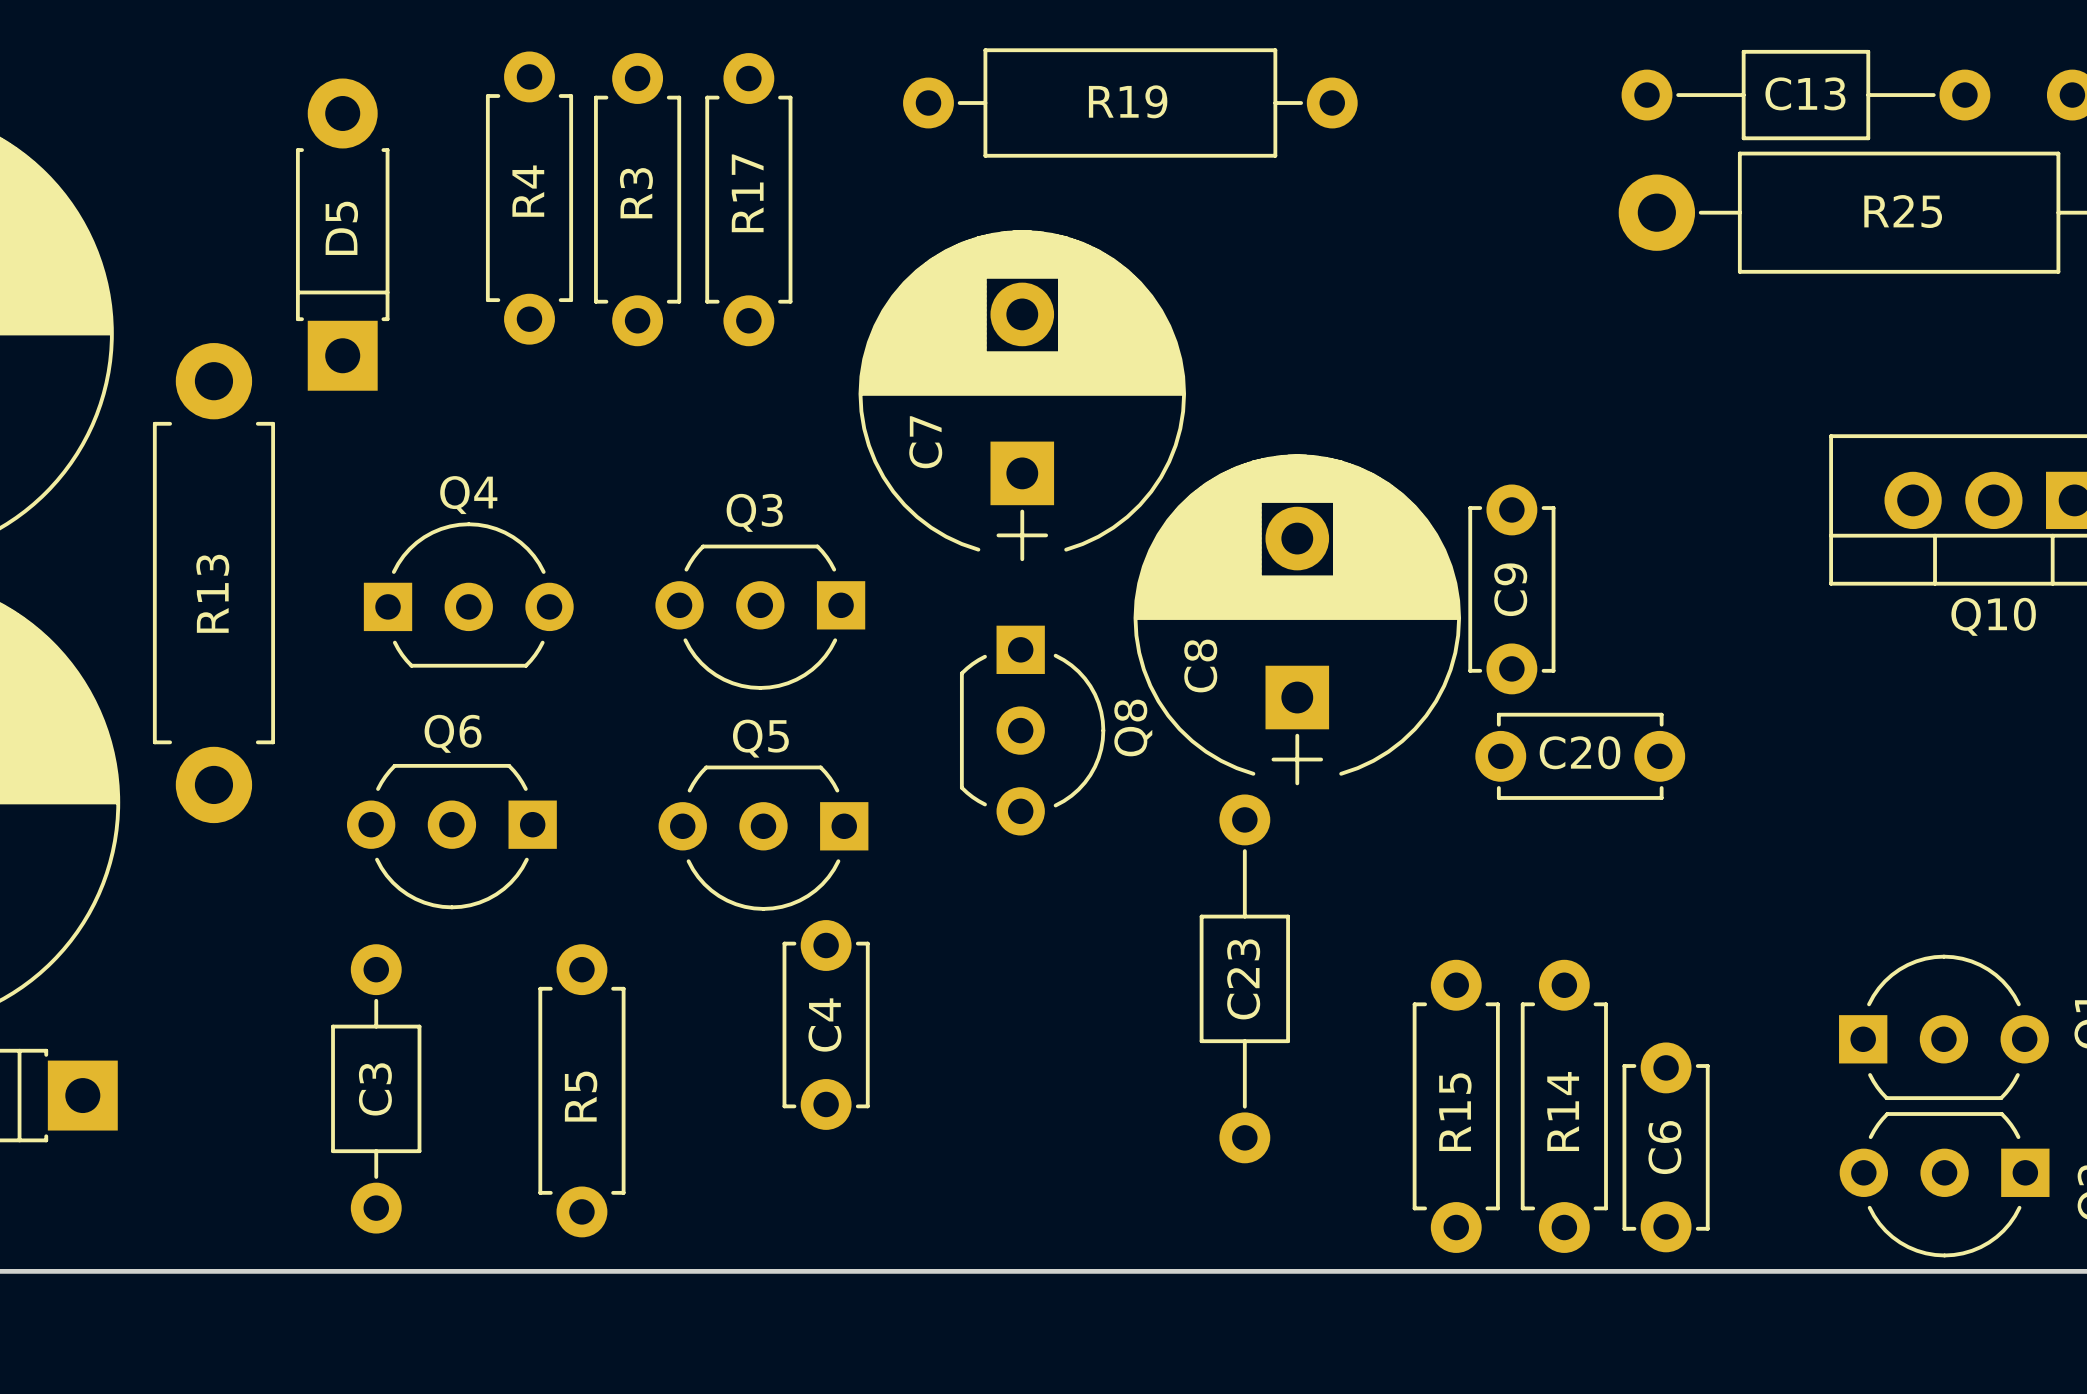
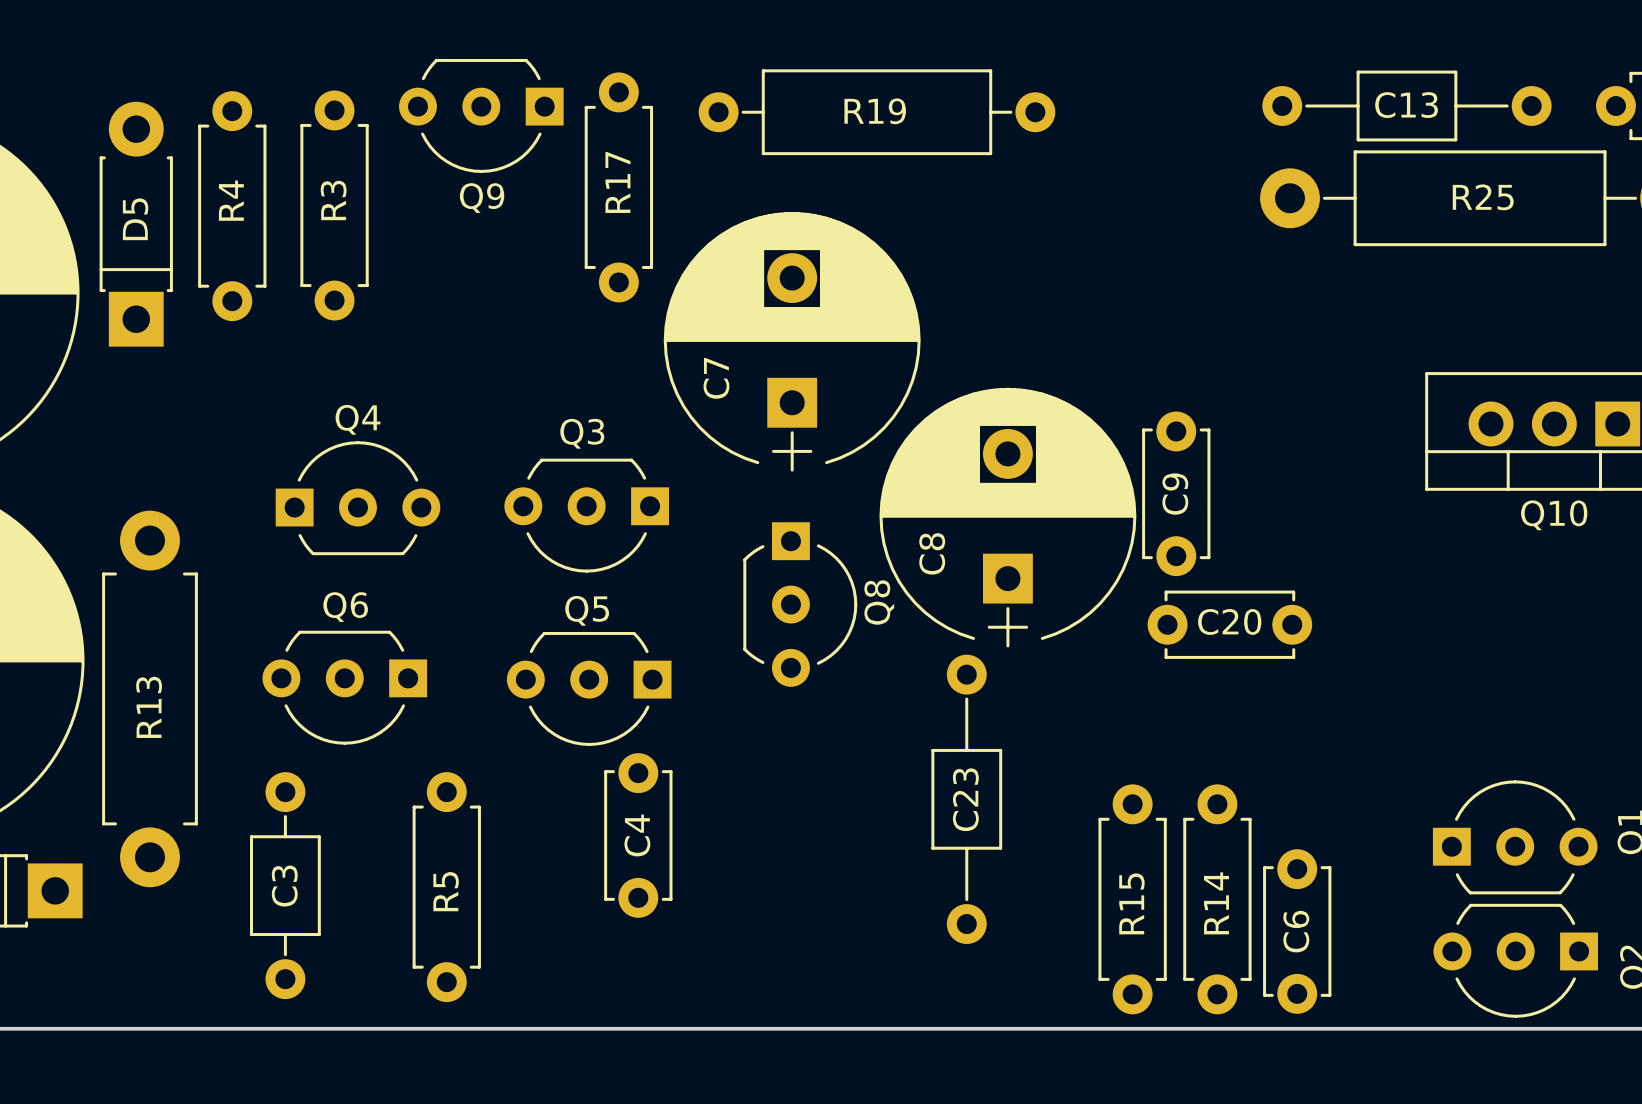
Q9: none -> (481, 115)
R4 position: (529, 198) -> (232, 206)
R3 position: (637, 199) -> (334, 205)
R17 position: (748, 199) -> (618, 187)
D5 position: (342, 234) -> (136, 224)
R13 position: (213, 583) -> (149, 698)

